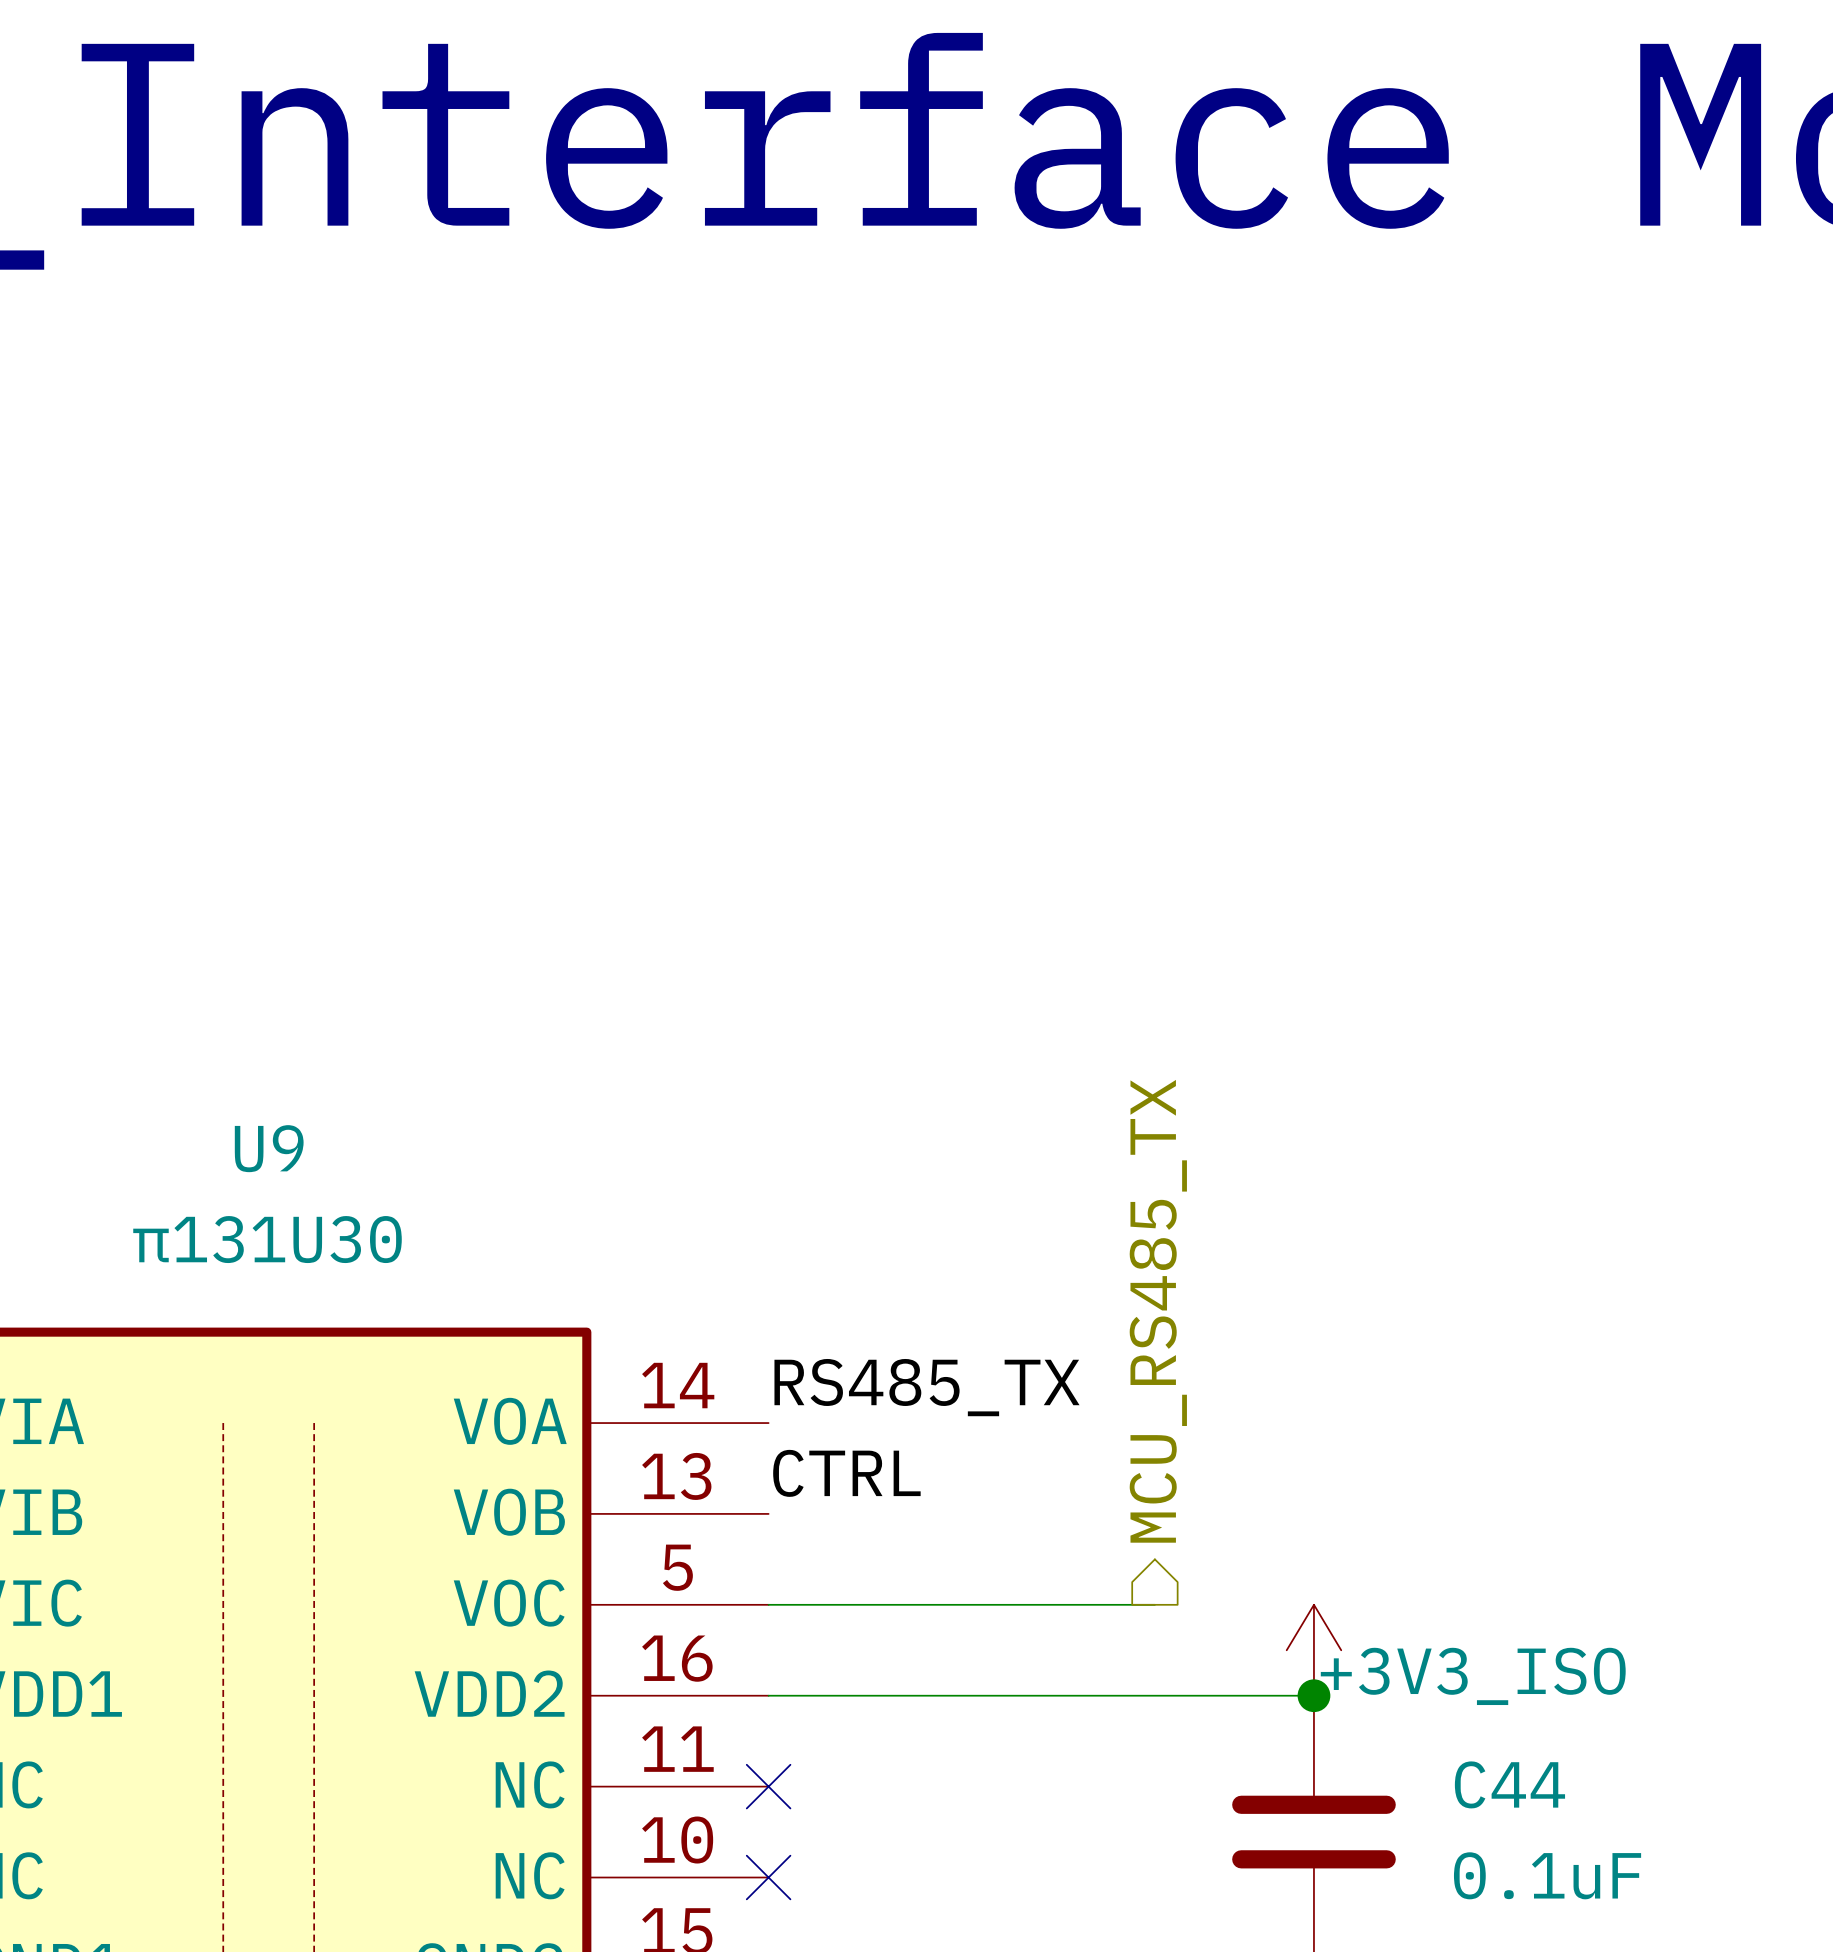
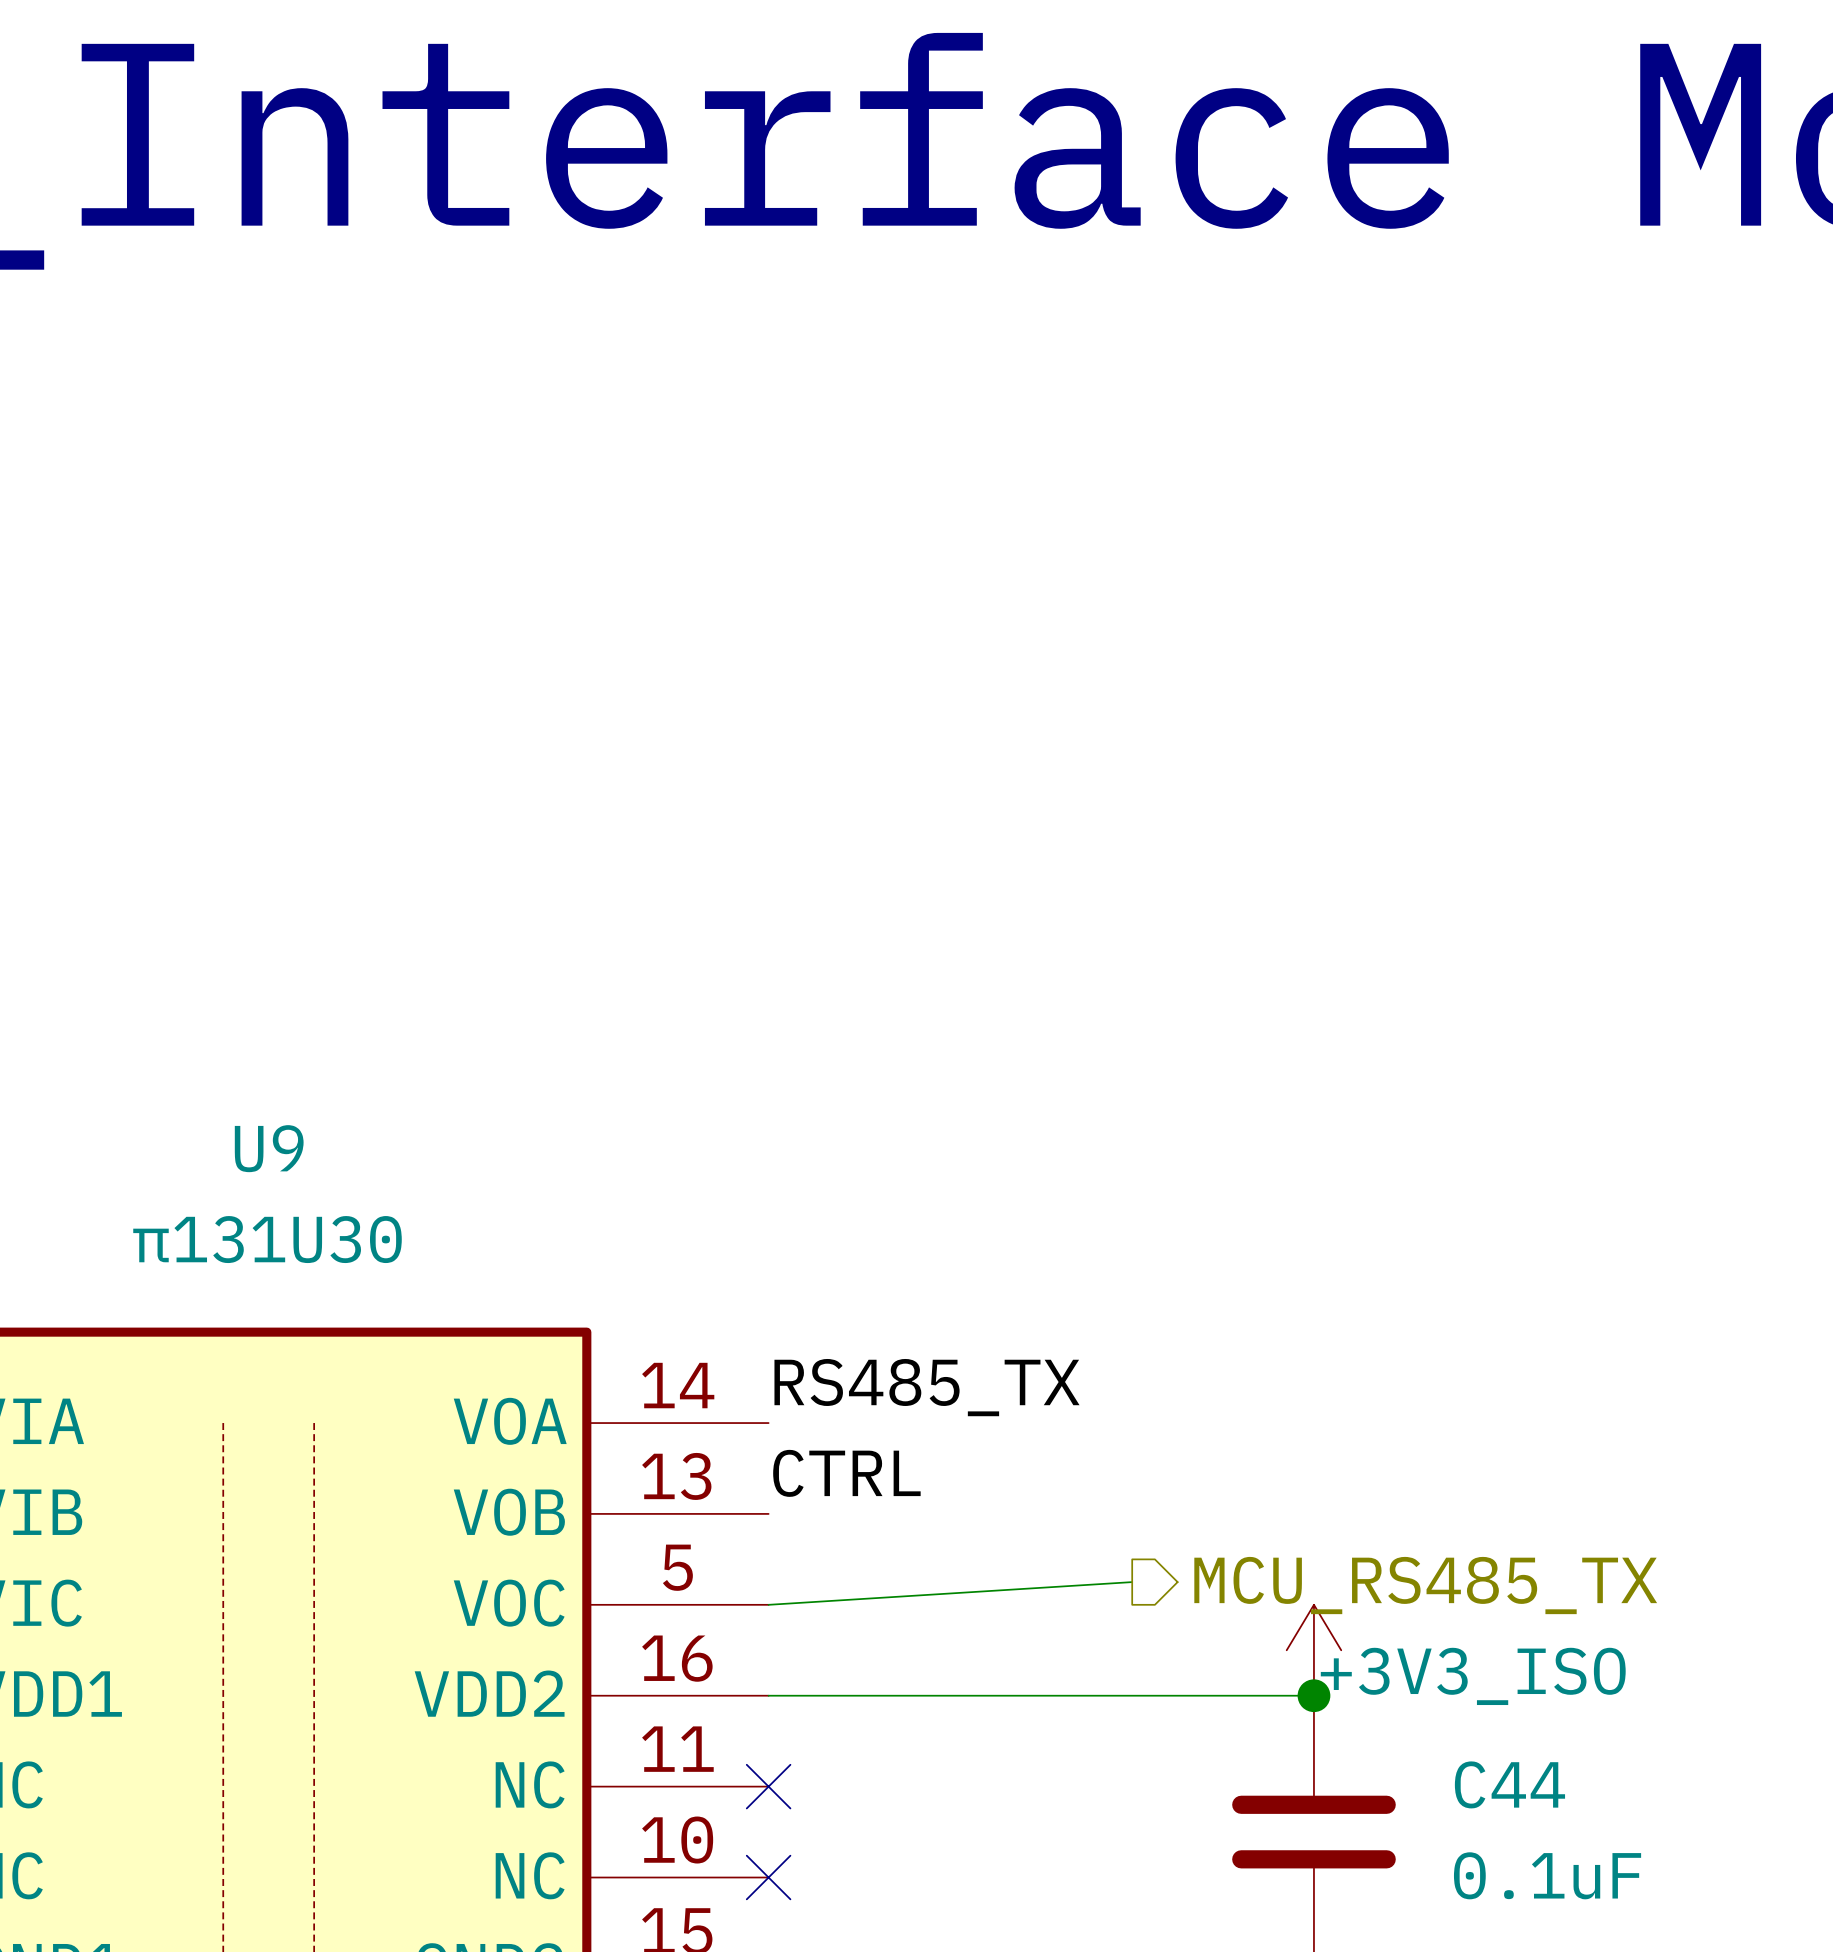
hierarchical label rotation: 0° (1158, 1311) -> 90° clockwise (1425, 1585)
wire: (768, 1604) (1154, 1604) -> (768, 1604) (1132, 1582)

